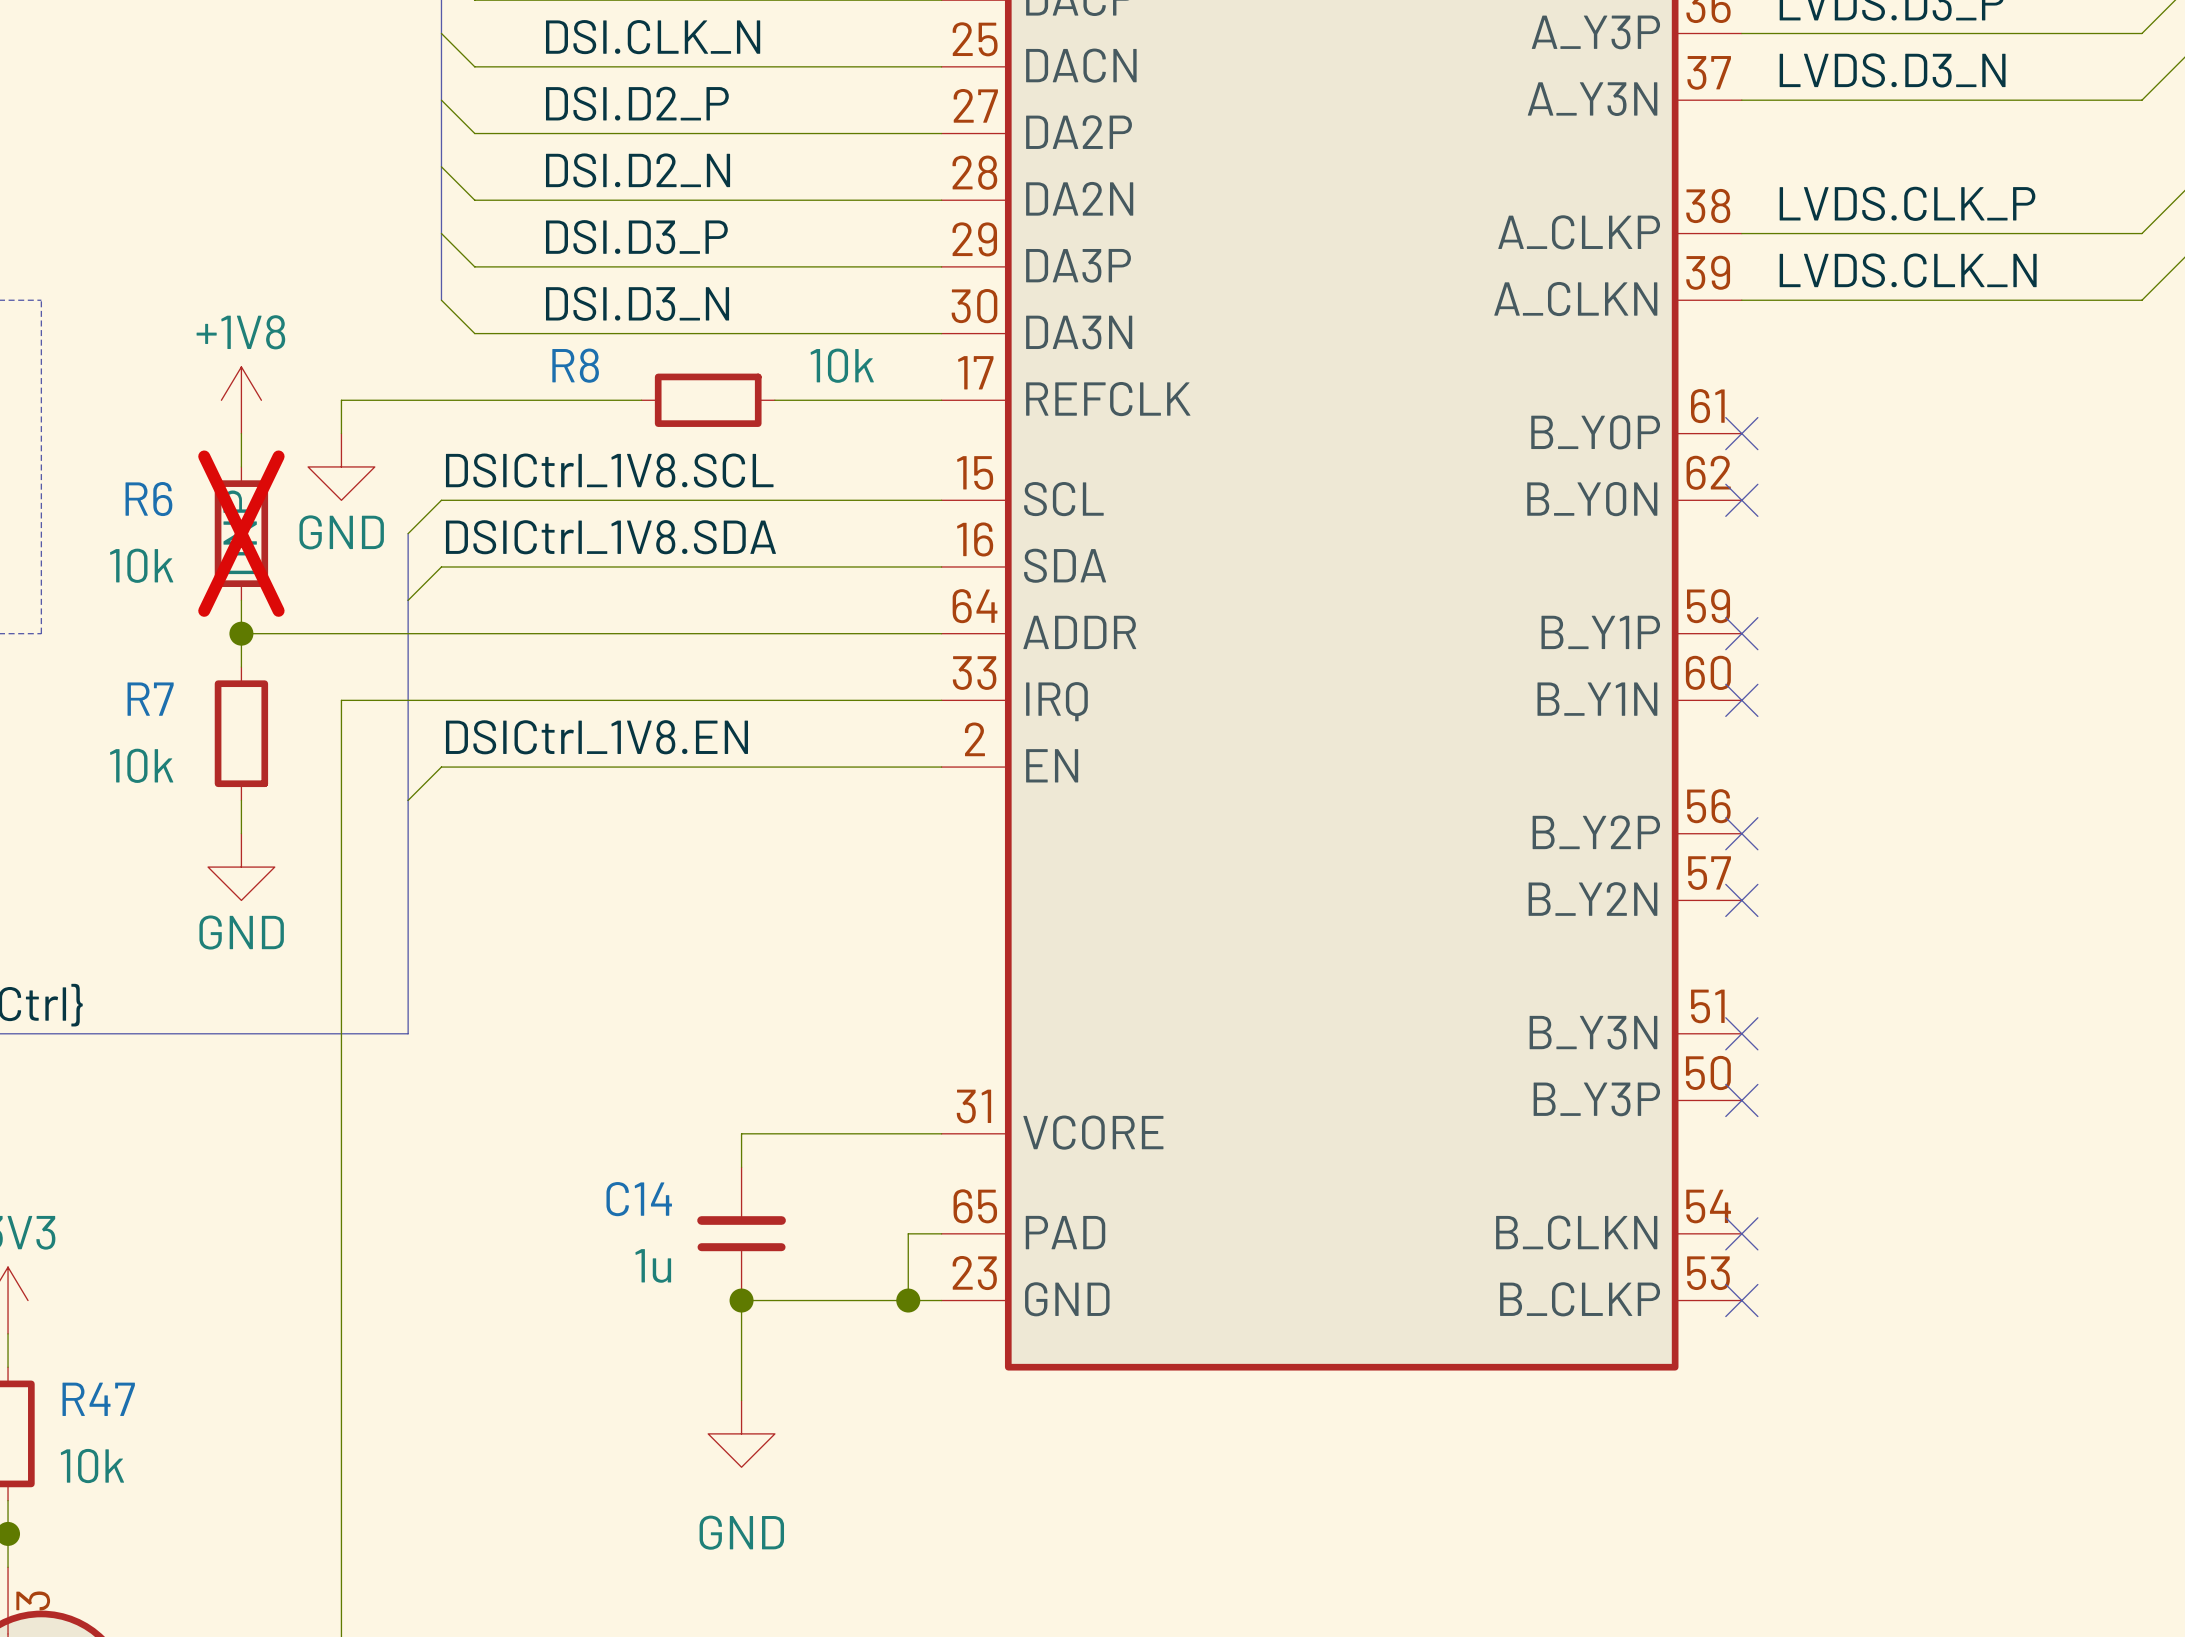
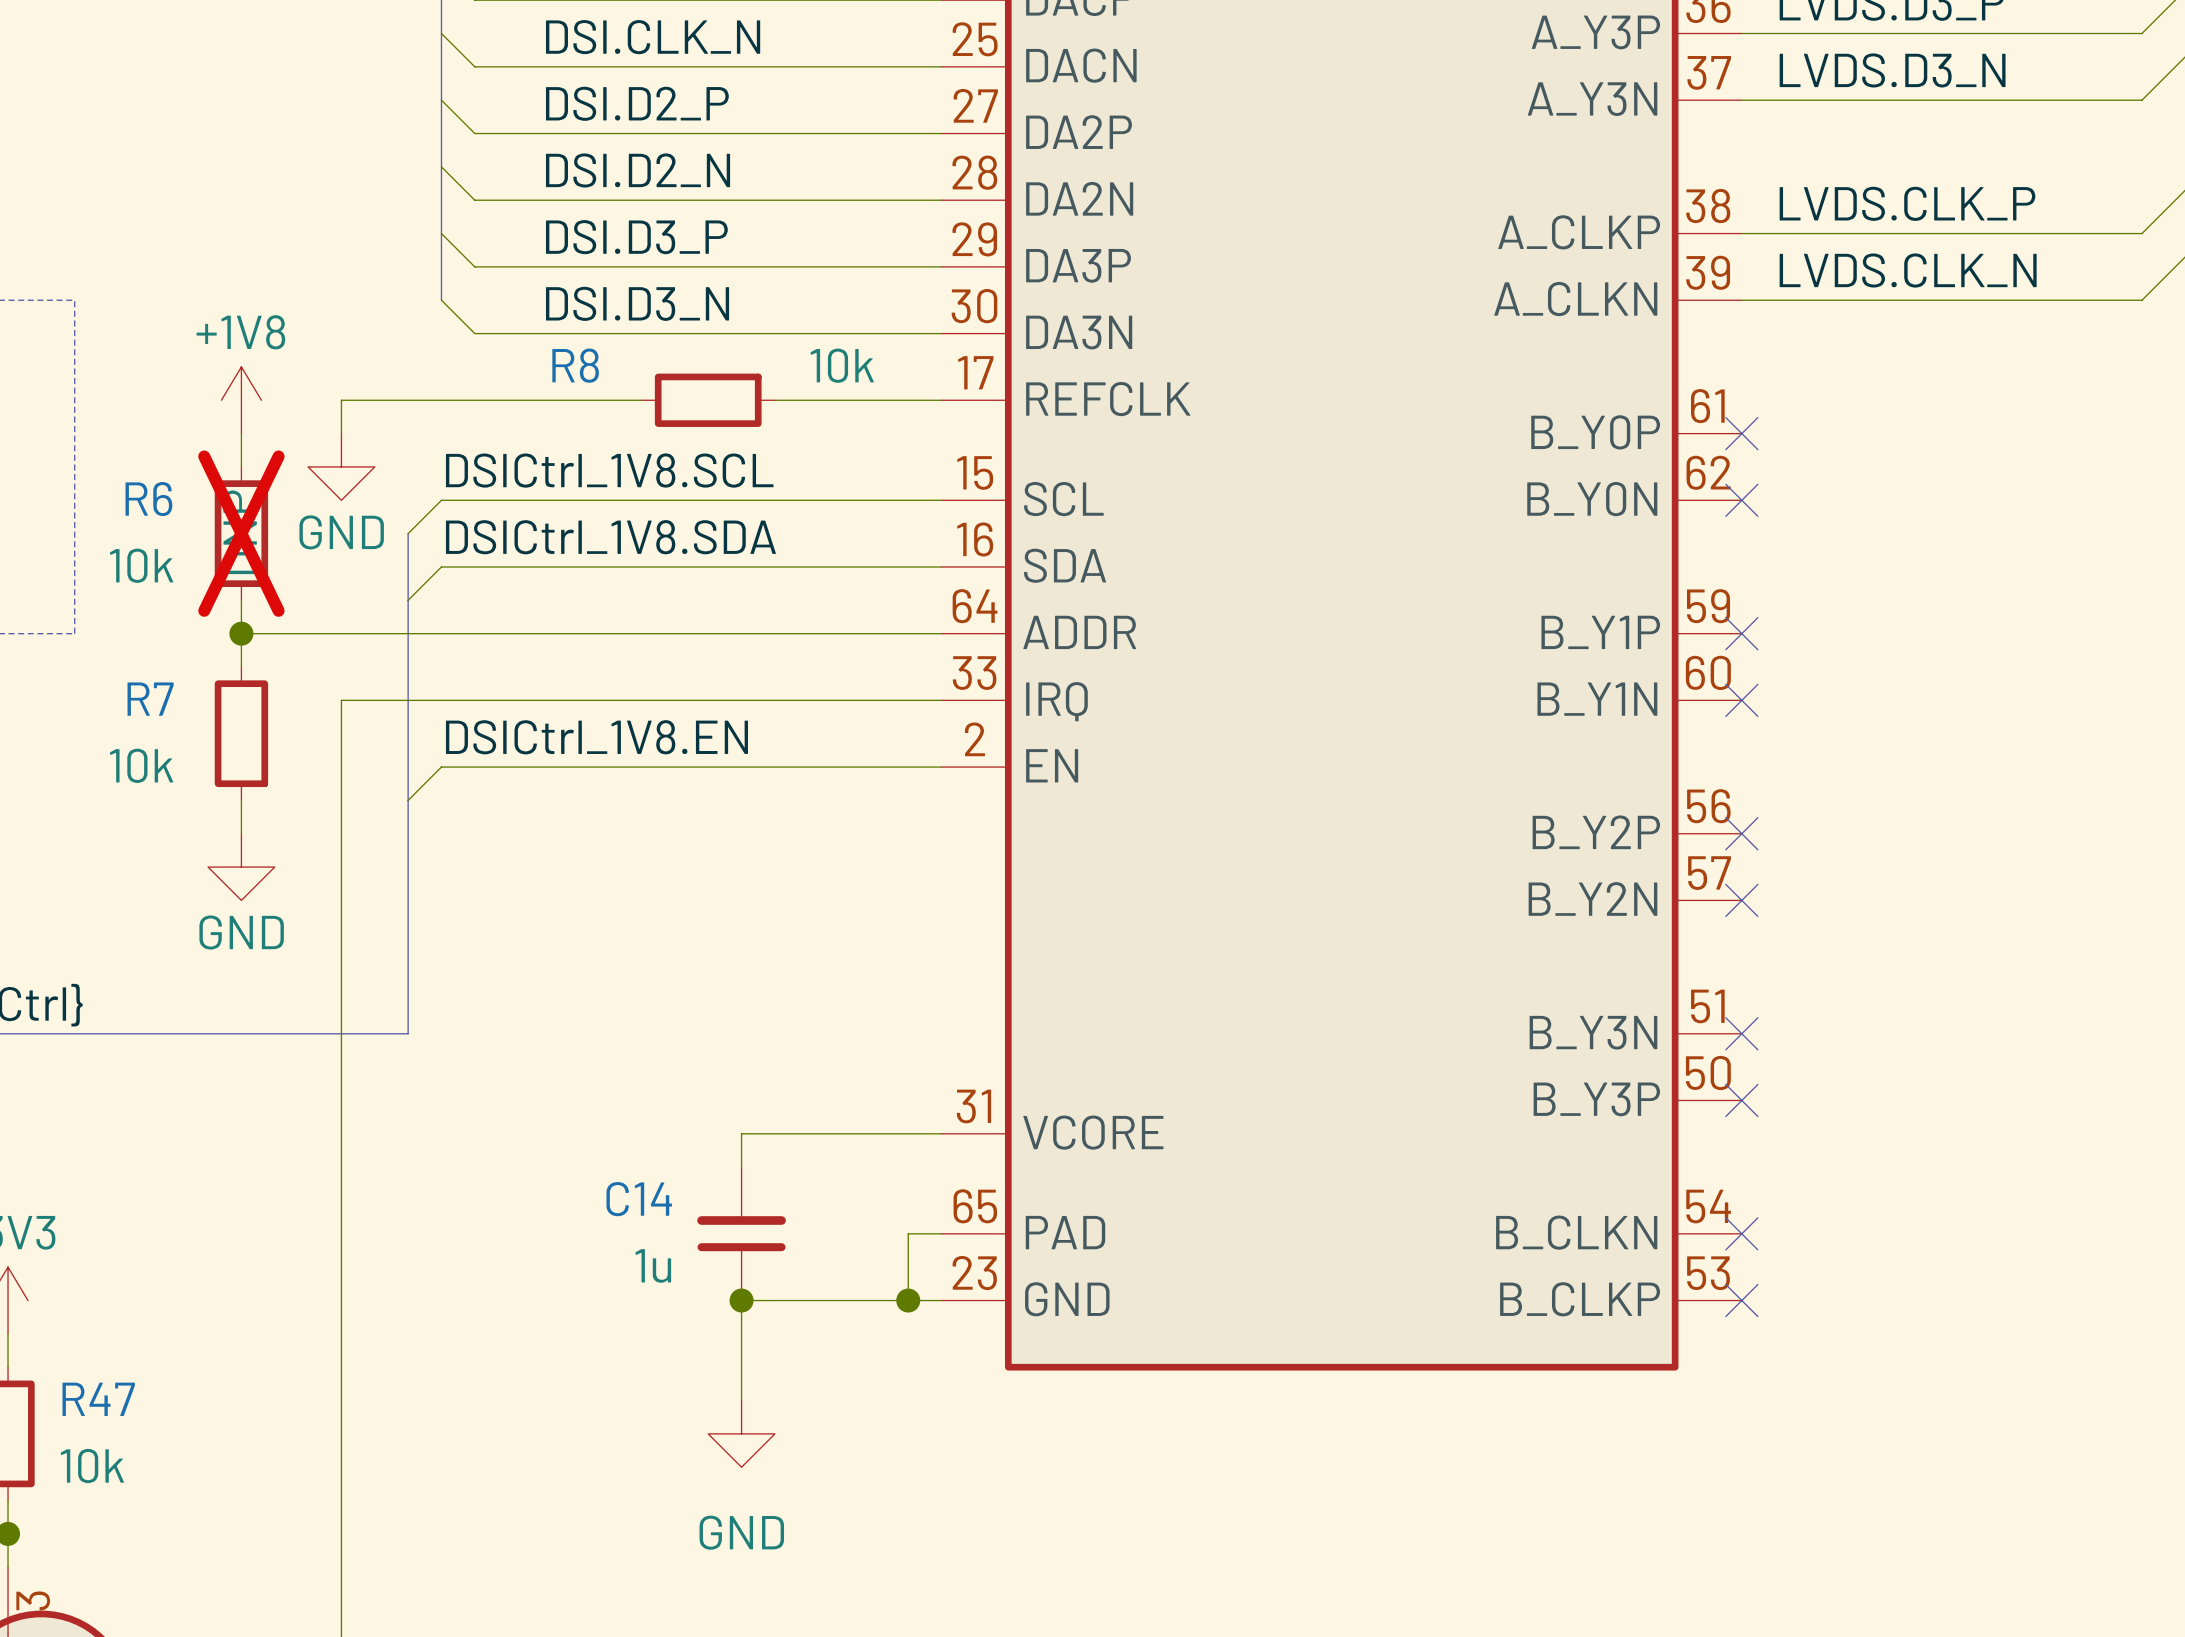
line: (41, 300) (41, 633) -> (41, 300) (74, 300) (74, 633) (41, 633)

